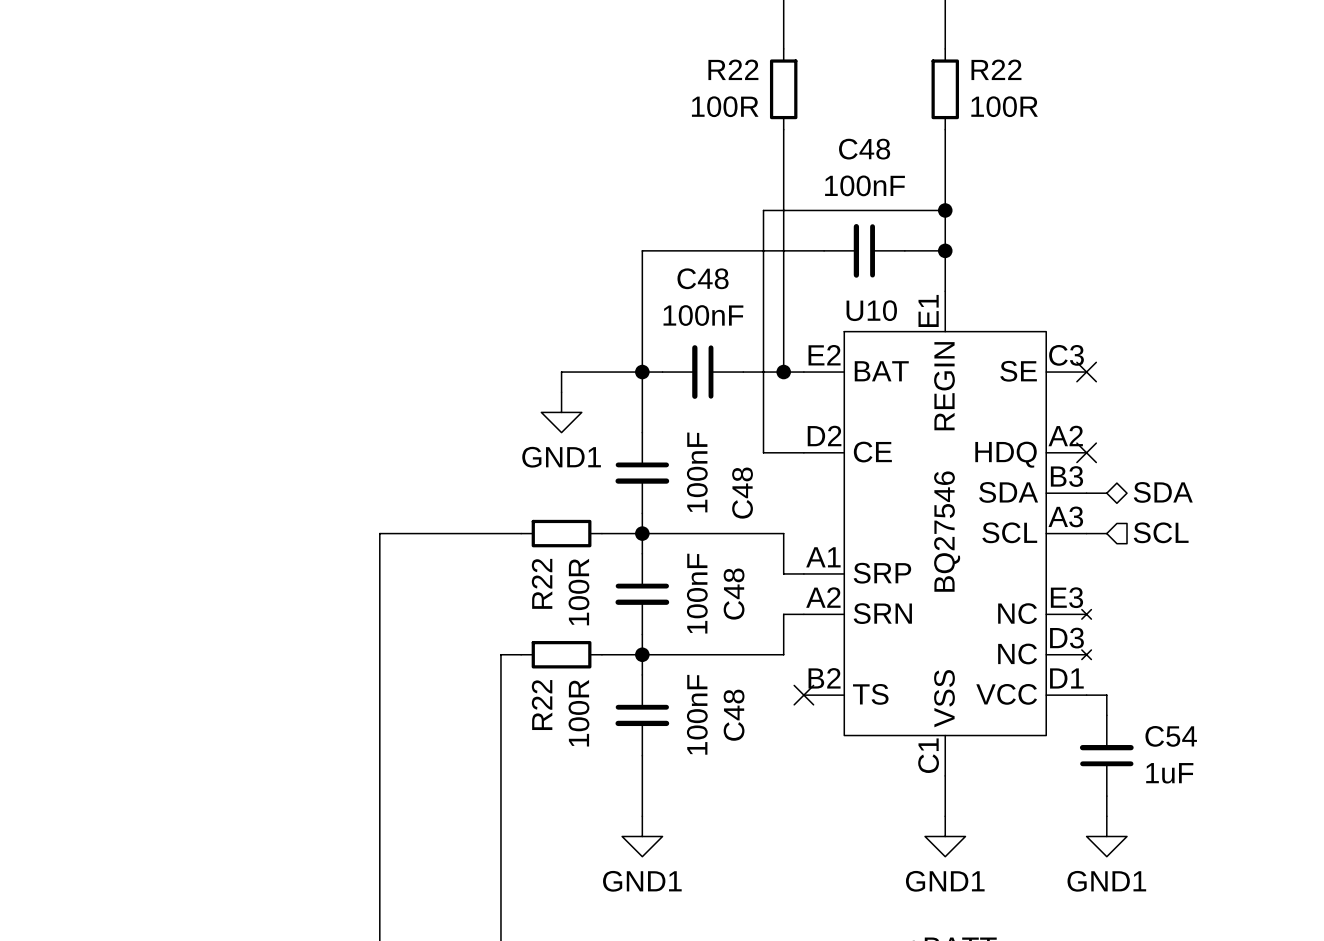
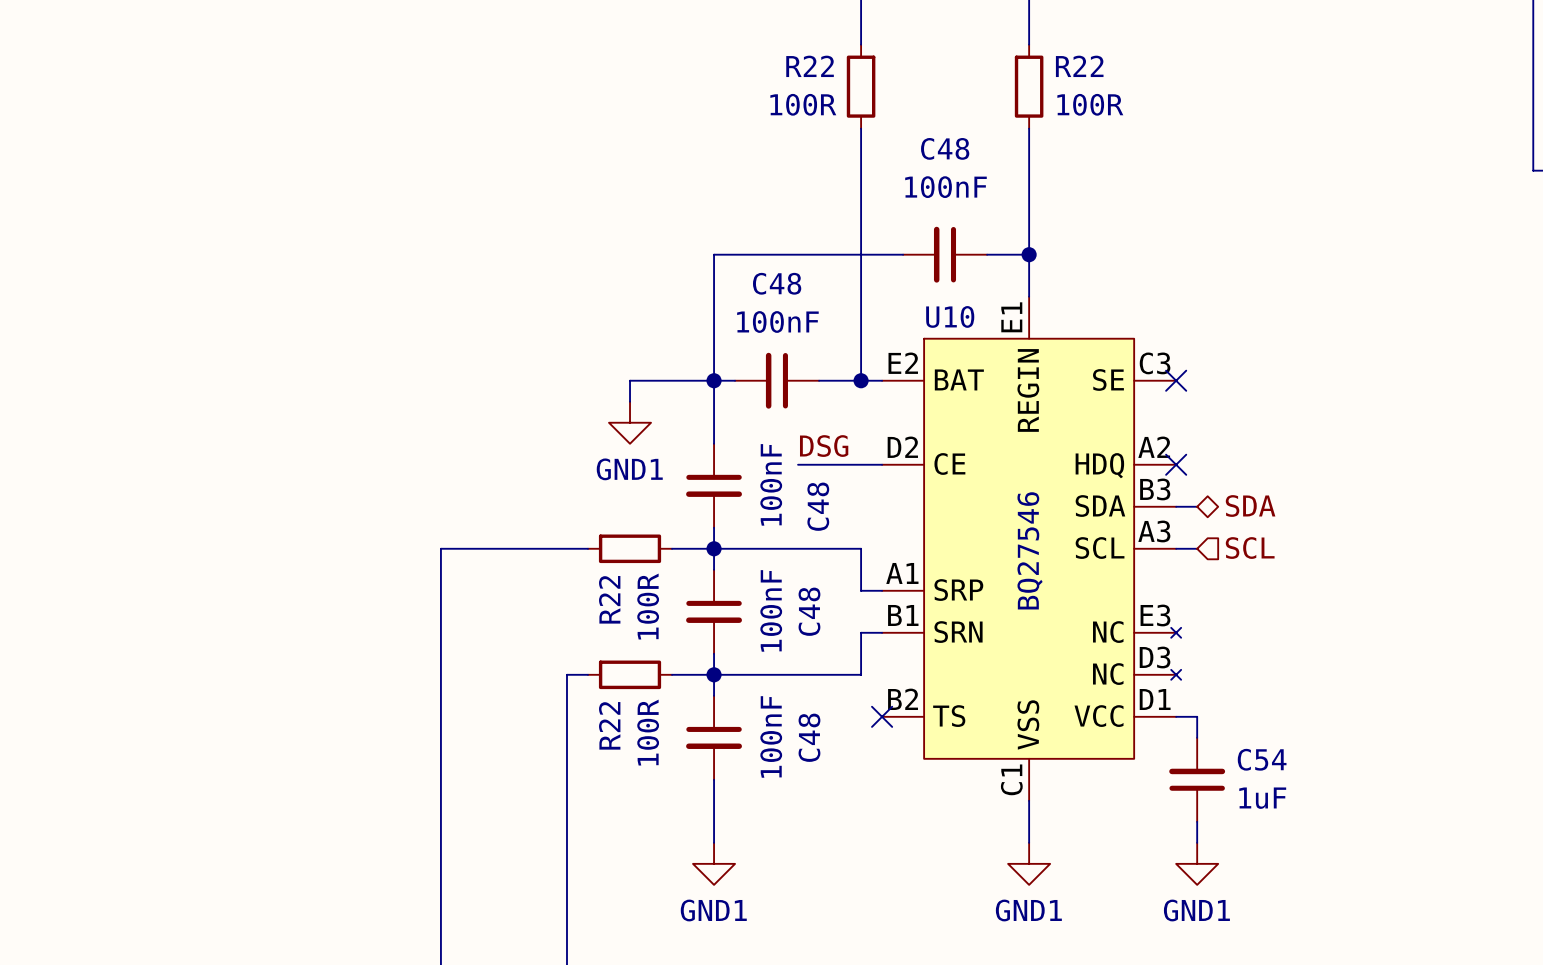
wire: (945, 210) (763, 210) (763, 452) -> (798, 464) (840, 464)
junction: (945, 210) -> none
label: none -> DSG (824, 446)
U10 pin number: A2 (823, 597) -> B1 (903, 615)

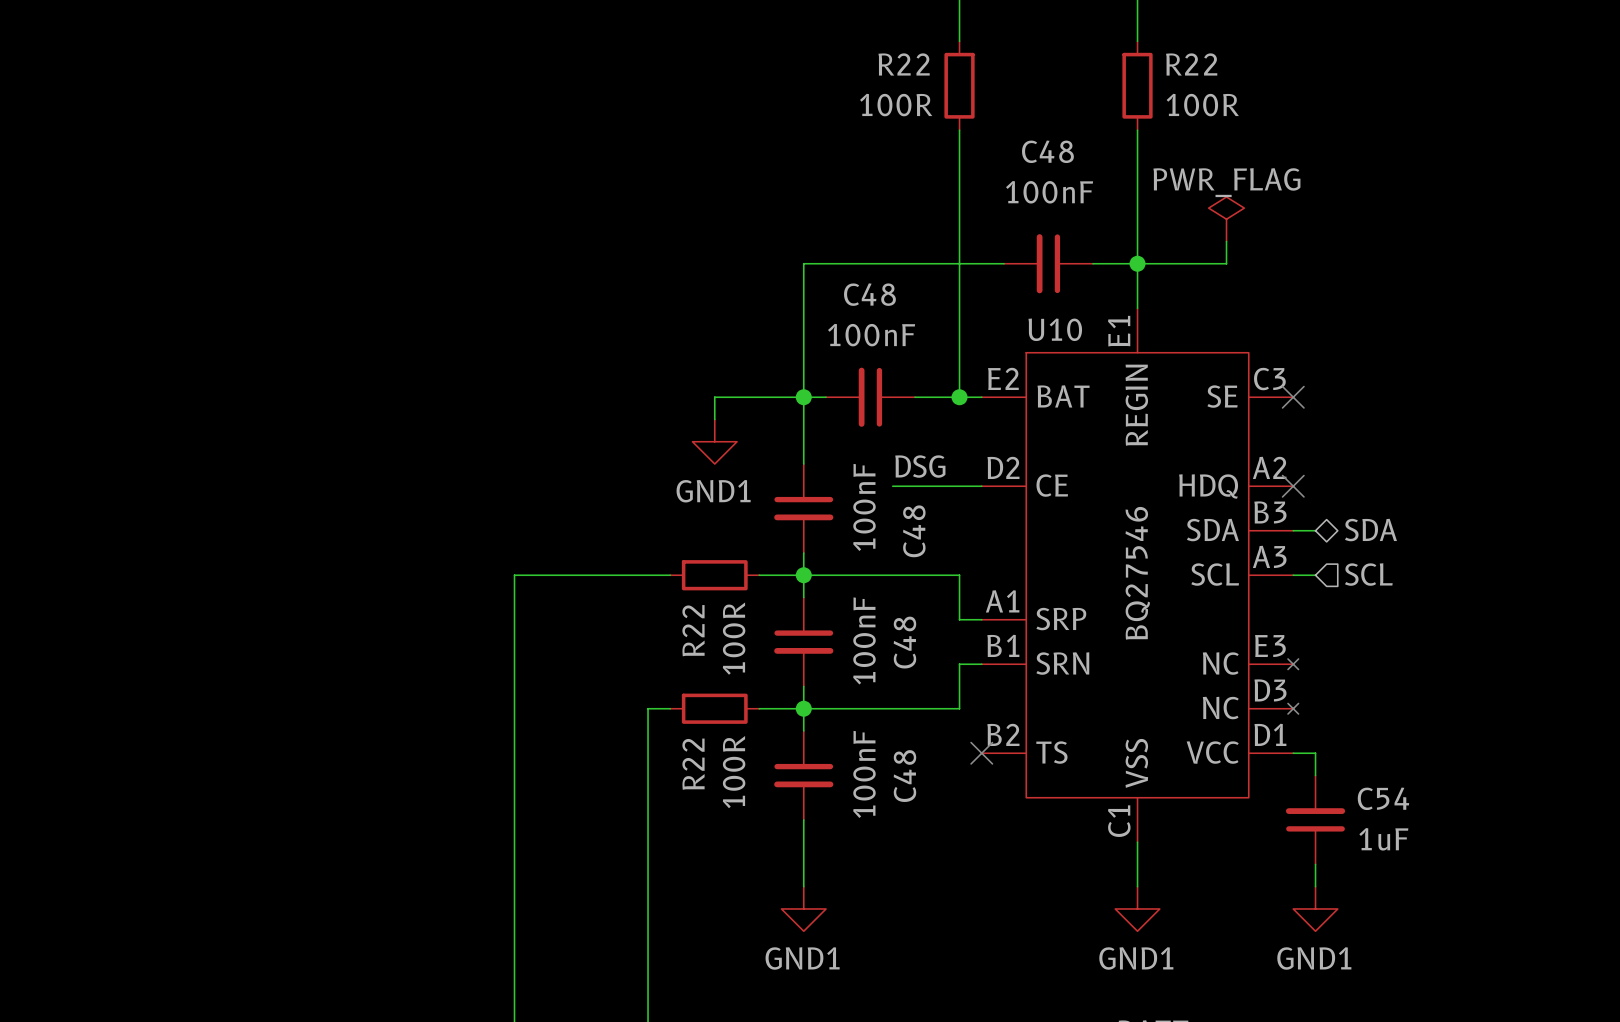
power symbol: none -> PWR_FLAG (1226, 219)
wire: none -> (1226, 241) (1226, 263) (1137, 263)

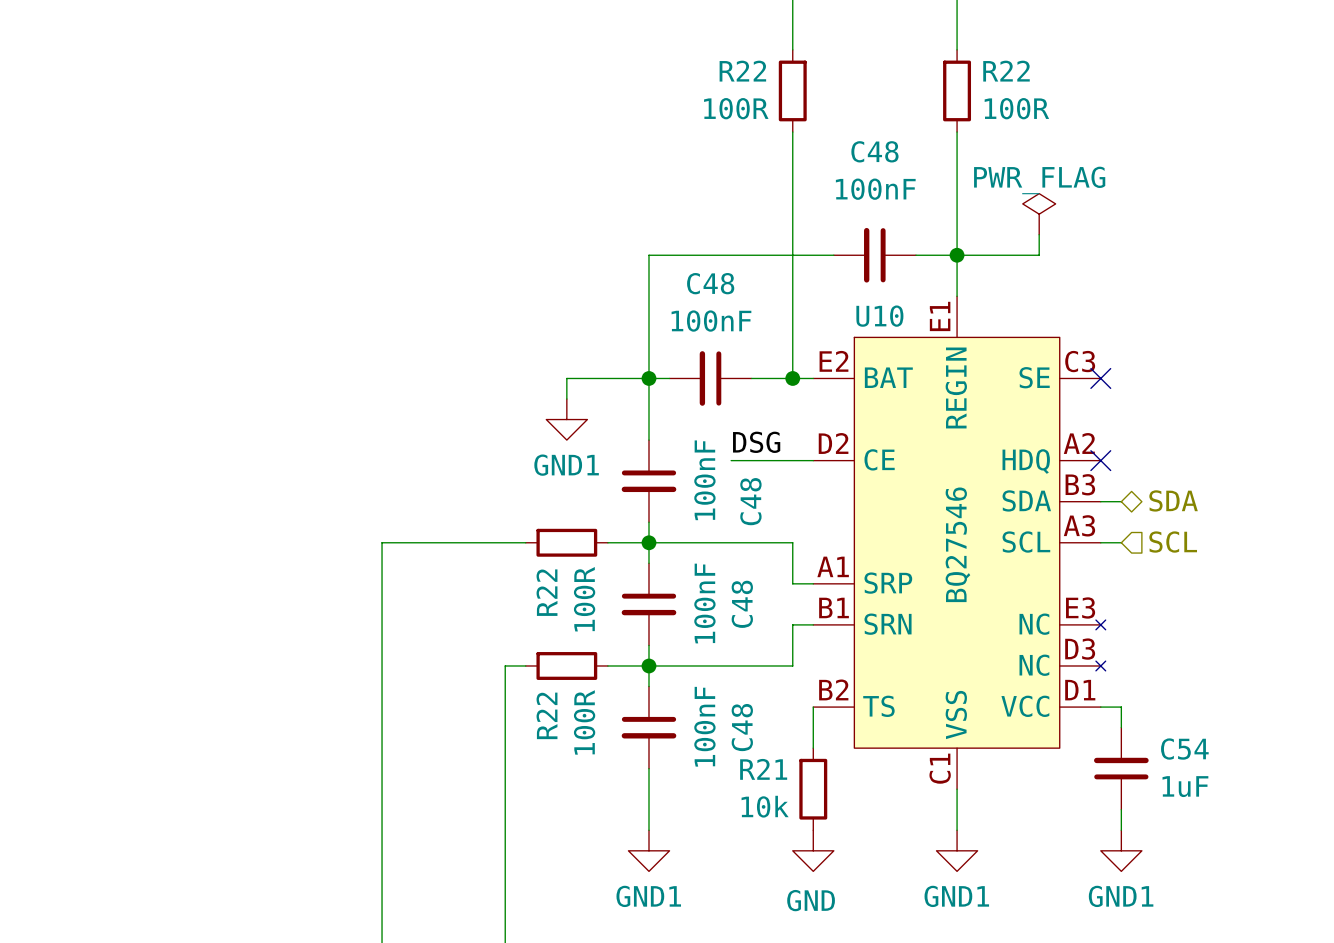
wire: none -> (813, 707) (813, 748)
no-connect mark: (981, 753) -> none
R21: none -> 10k (813, 789)
power symbol: none -> GND (813, 850)

